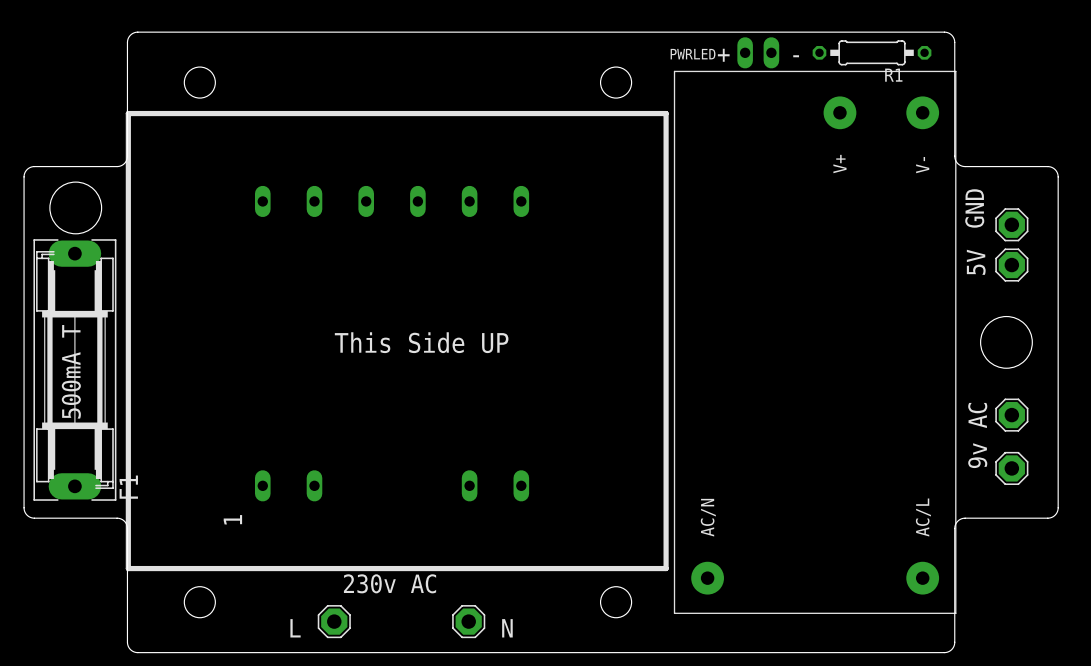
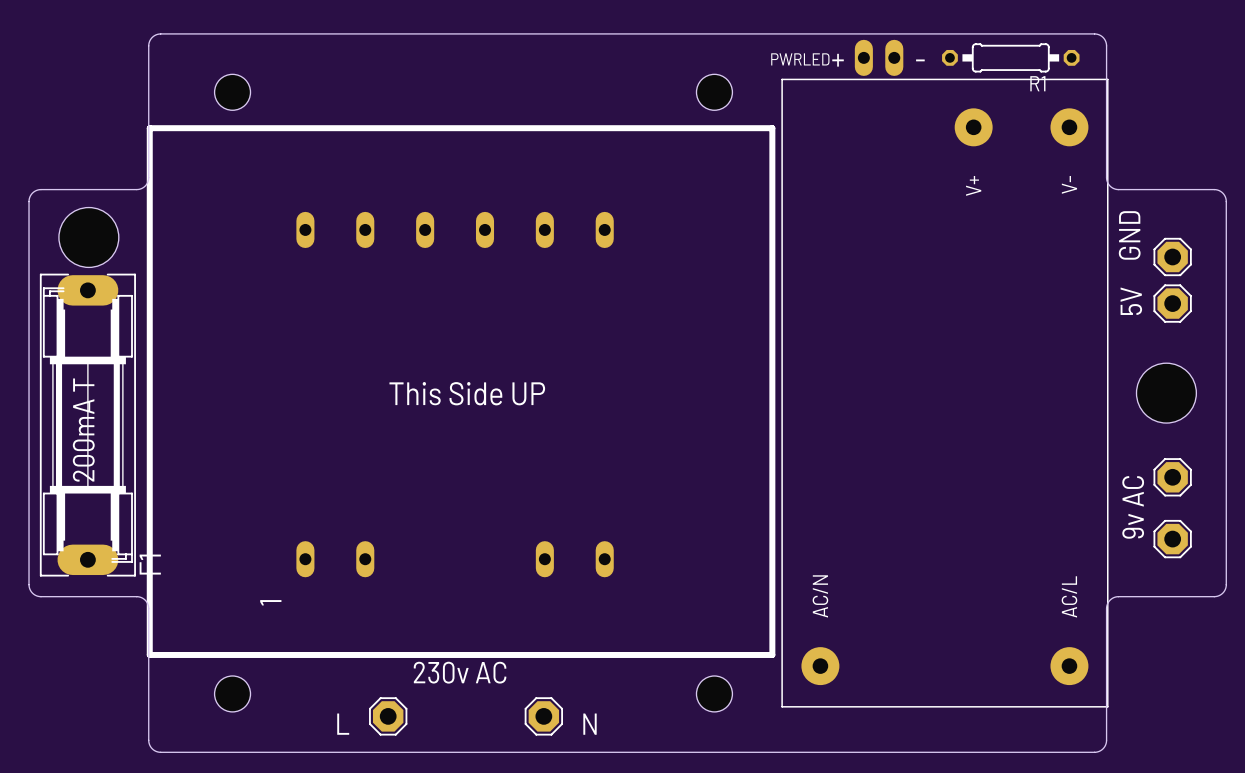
text: 500mA T (71, 371) -> 200mA T (83, 430)

